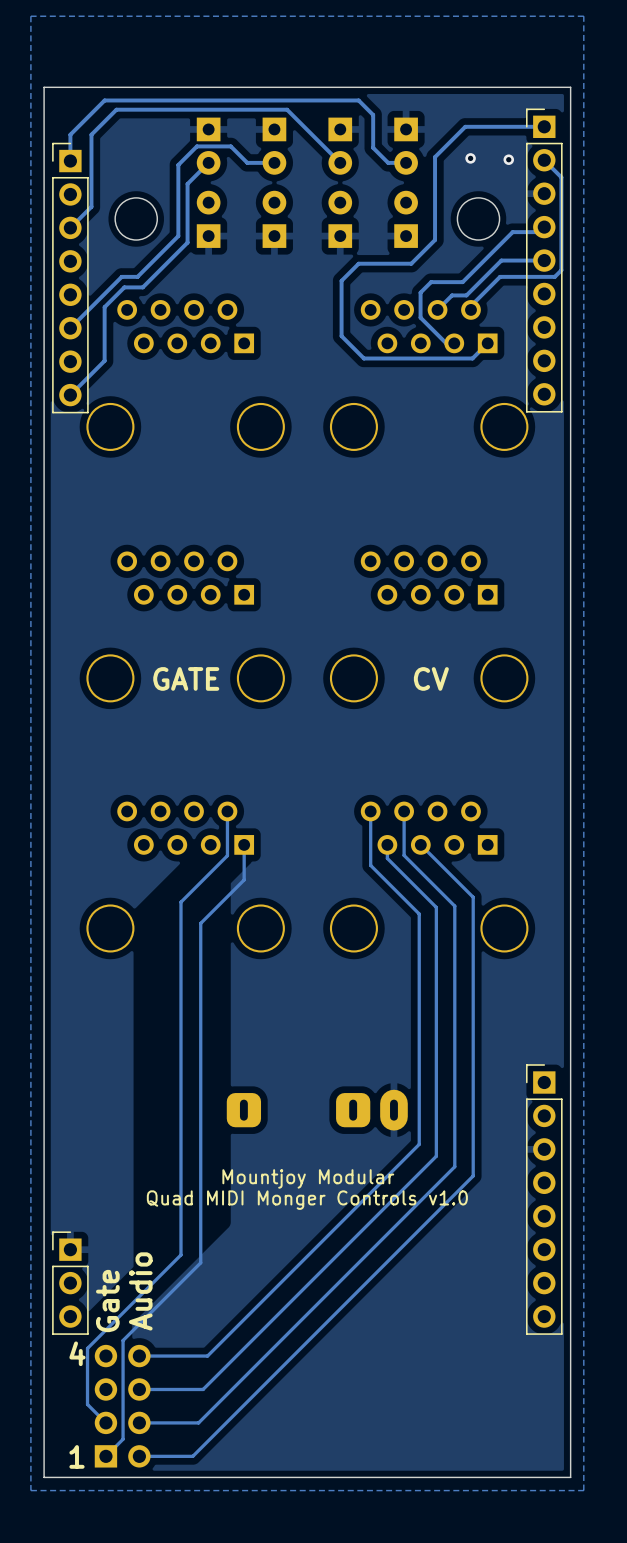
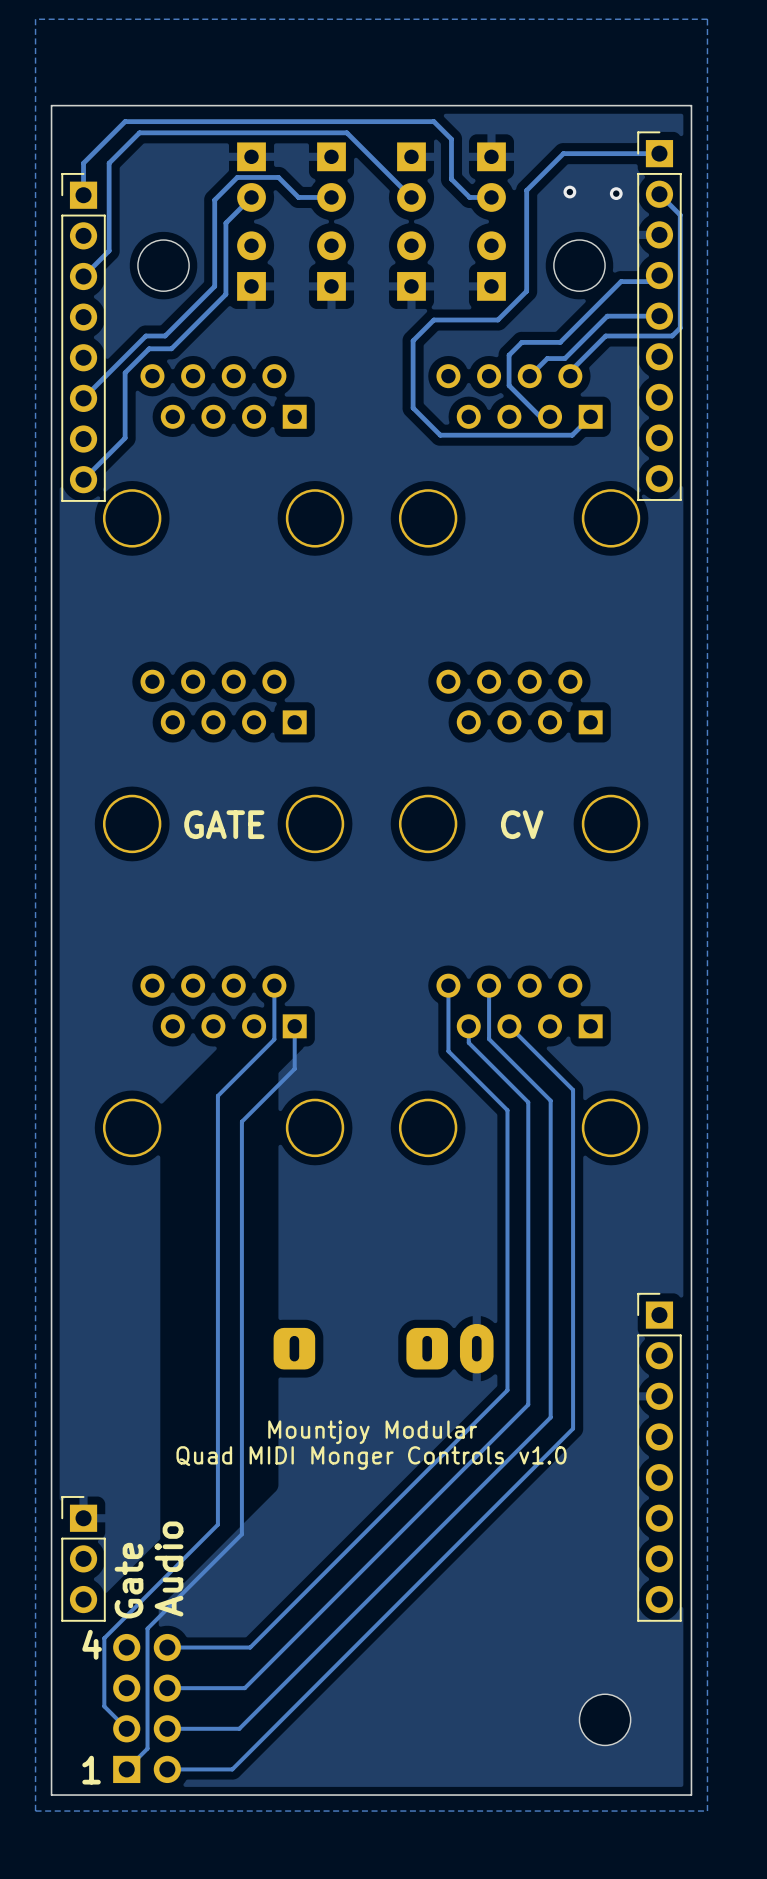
part: none -> (605, 1719)

